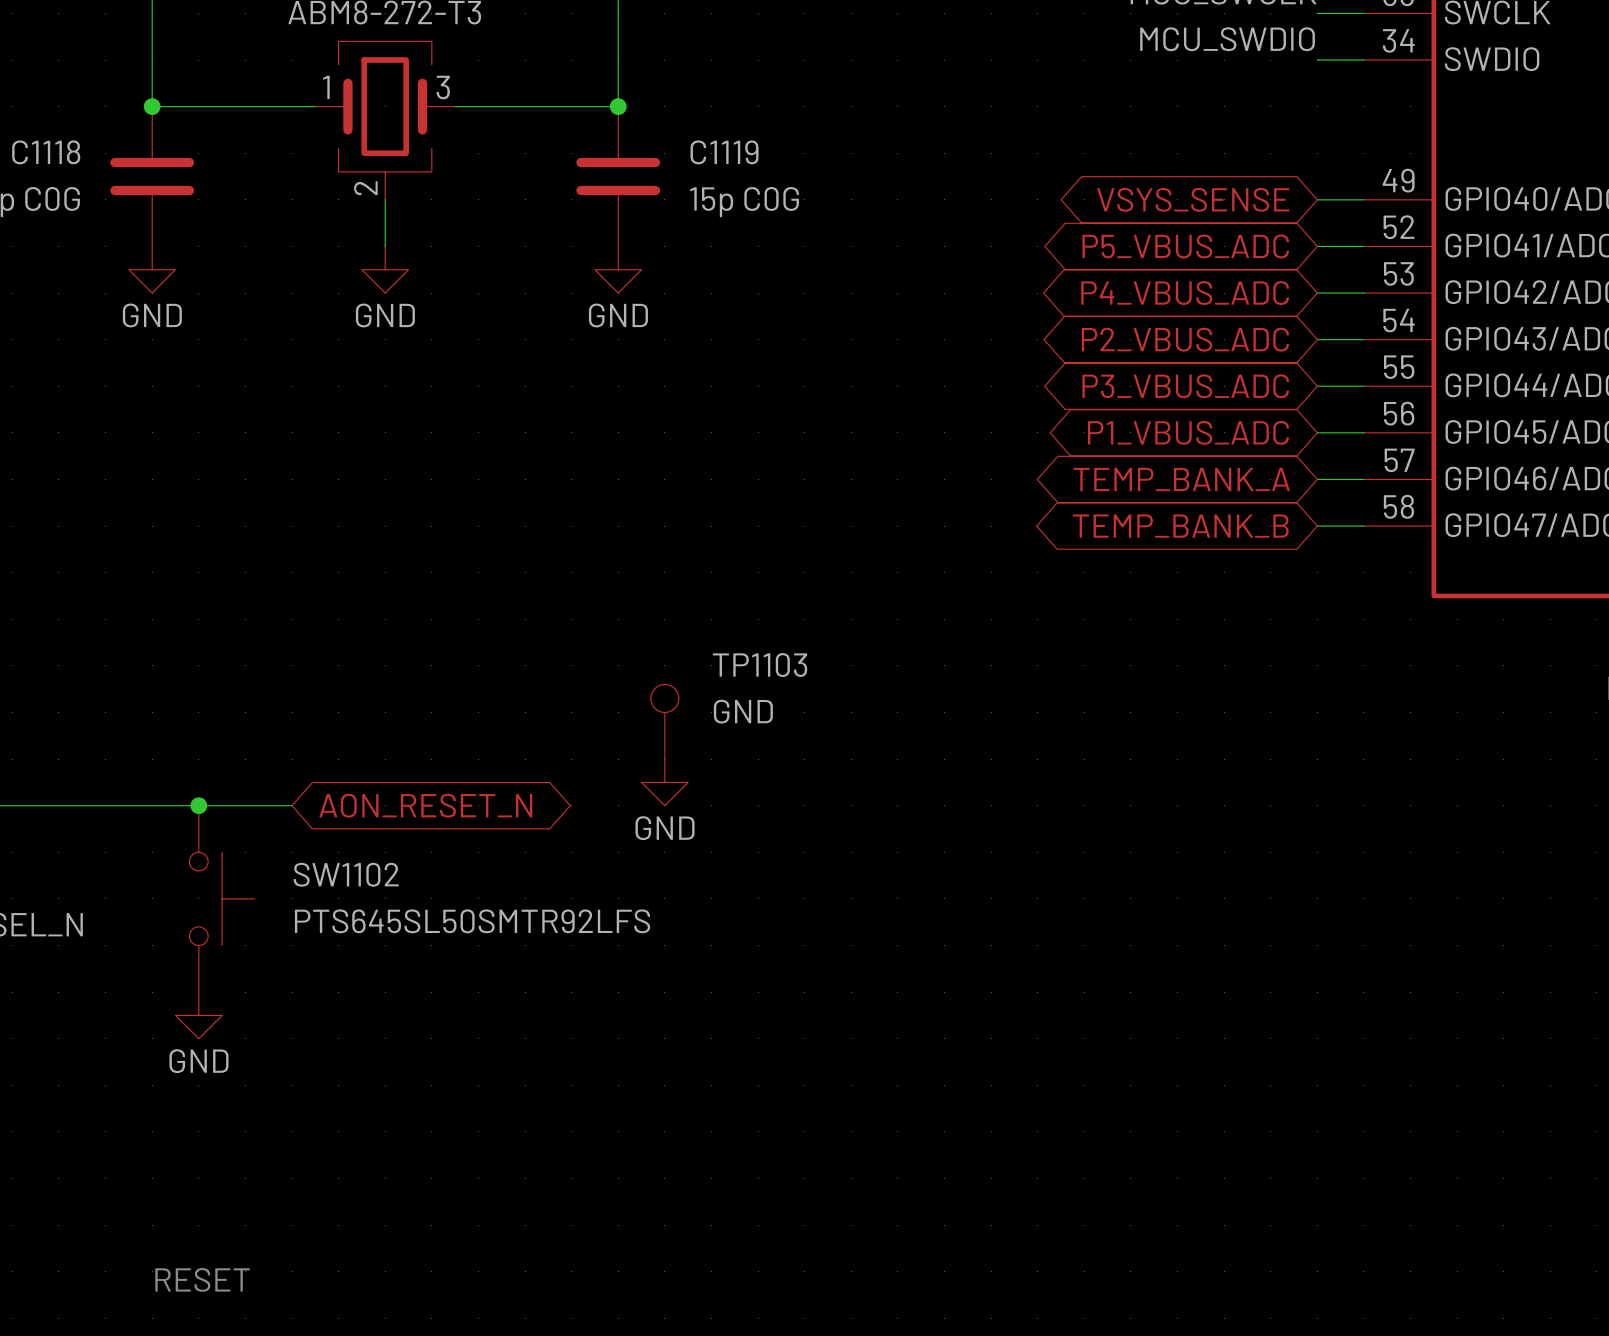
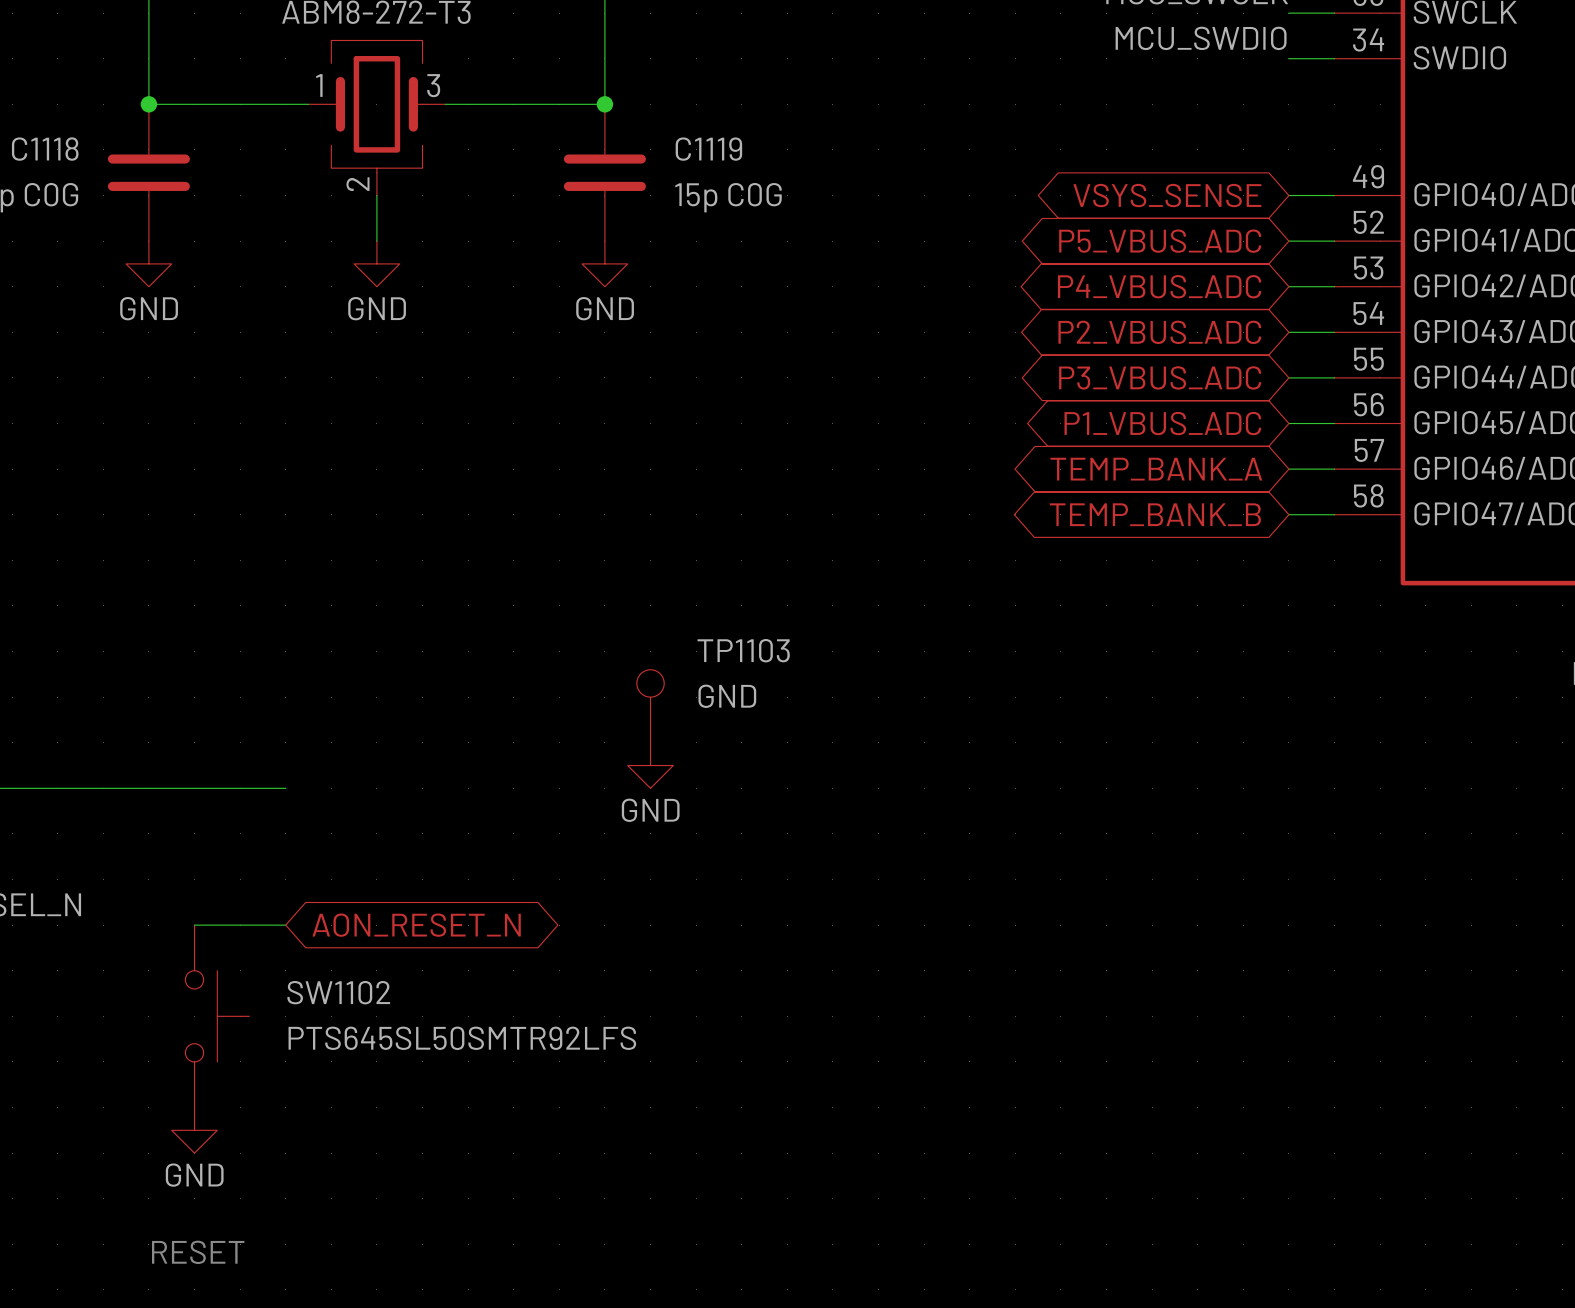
junction: (198, 805) -> none
global label position: AON_RESET_N (425, 805) -> AON_RESET_N (416, 925)
SW1102 position: (222, 898) -> (217, 1016)
wire: none -> (194, 925) (285, 925)
power symbol position: GND (198, 1015) -> GND (194, 1130)

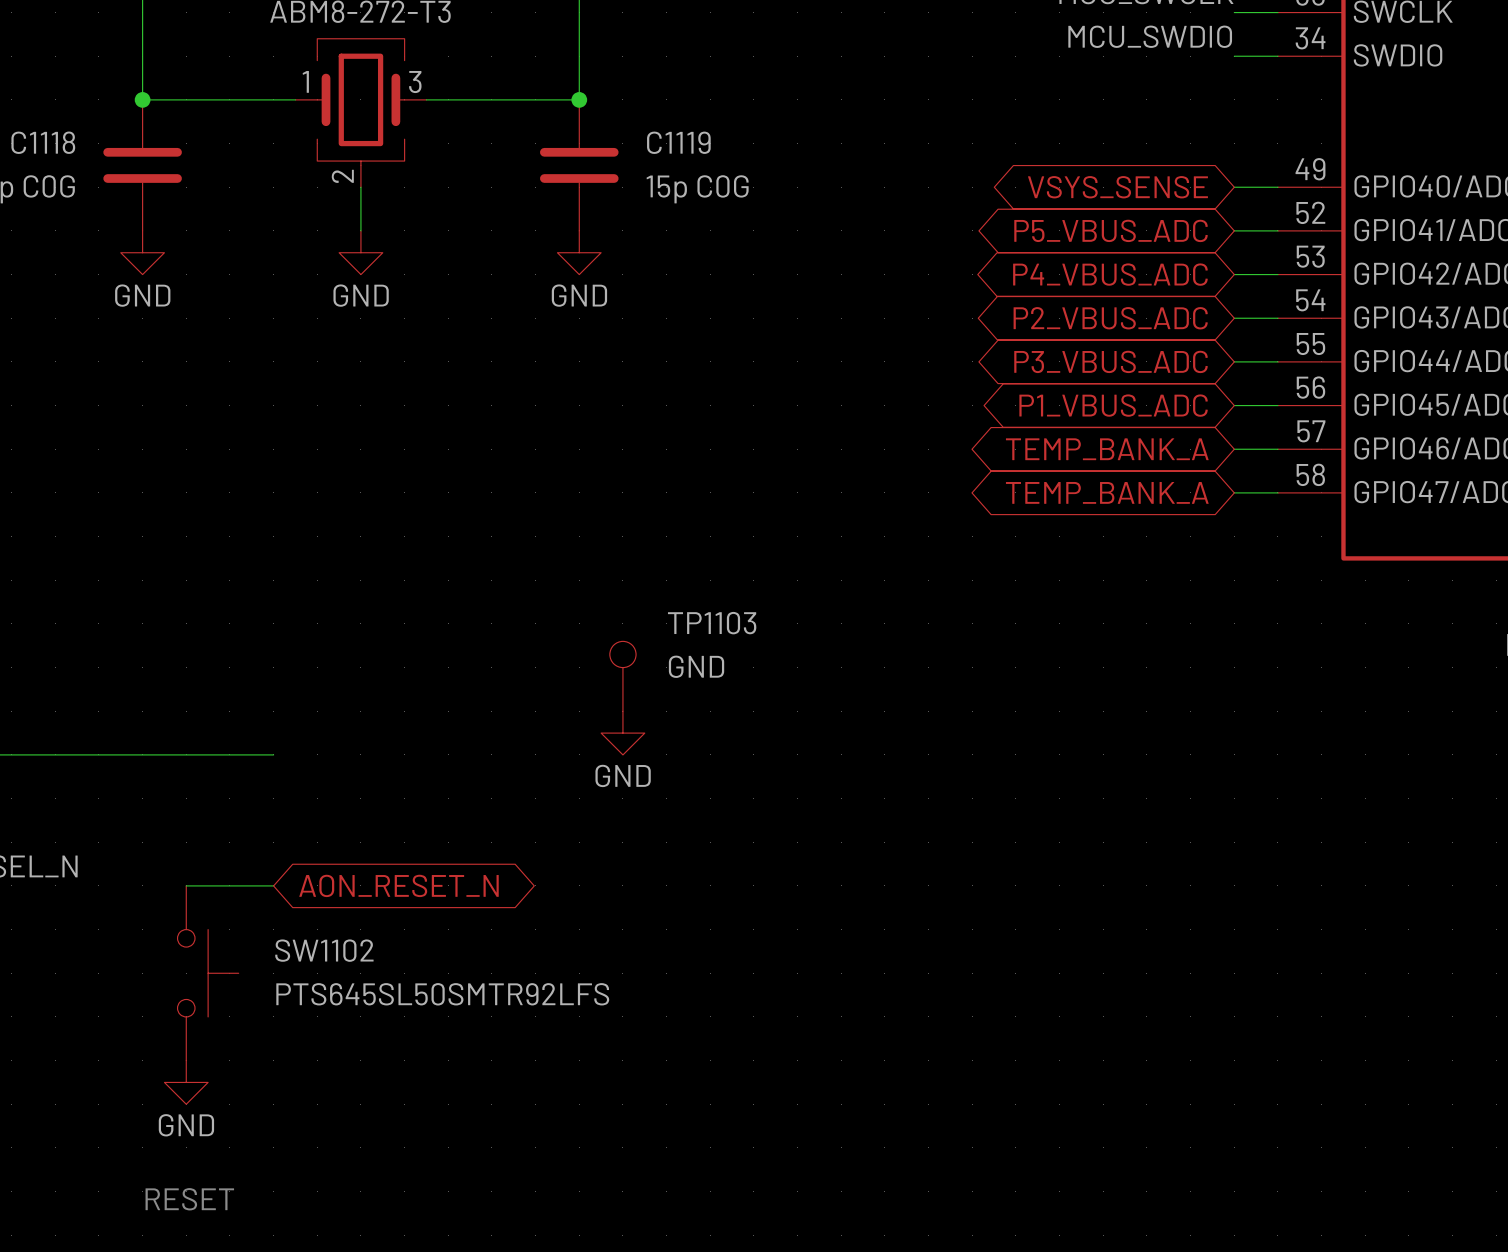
global label: TEMP_BANK_B (1155, 514) -> TEMP_BANK_A (1107, 492)

